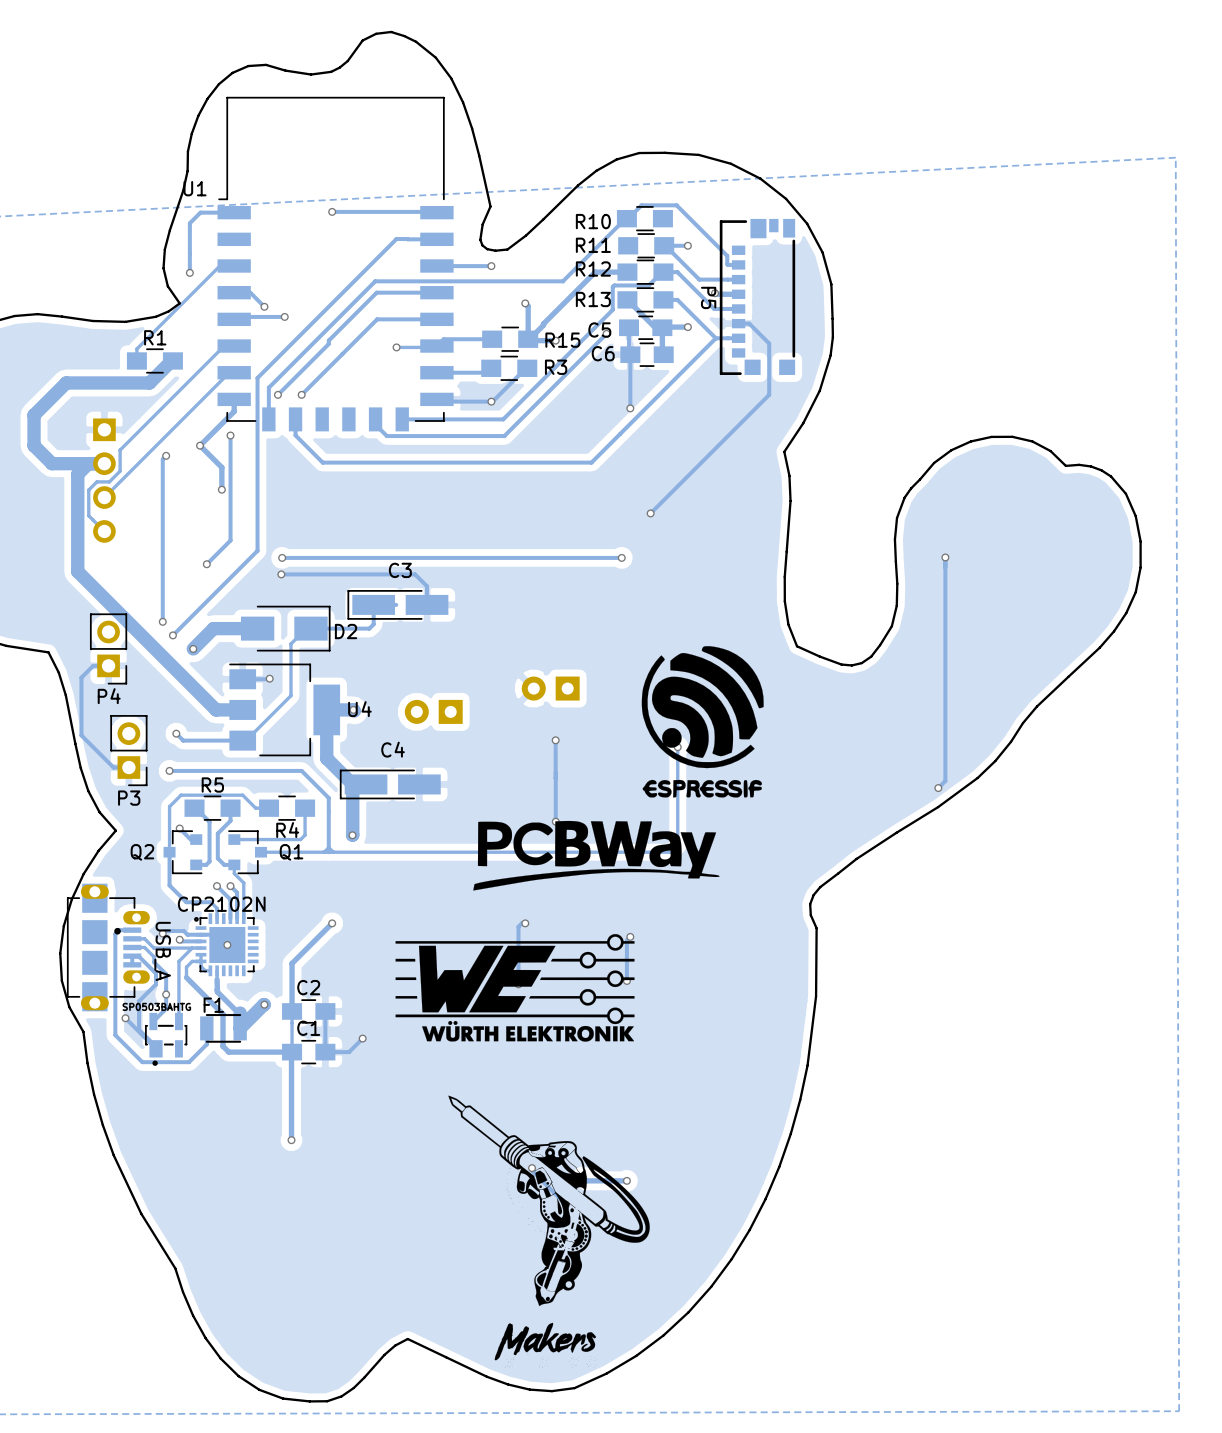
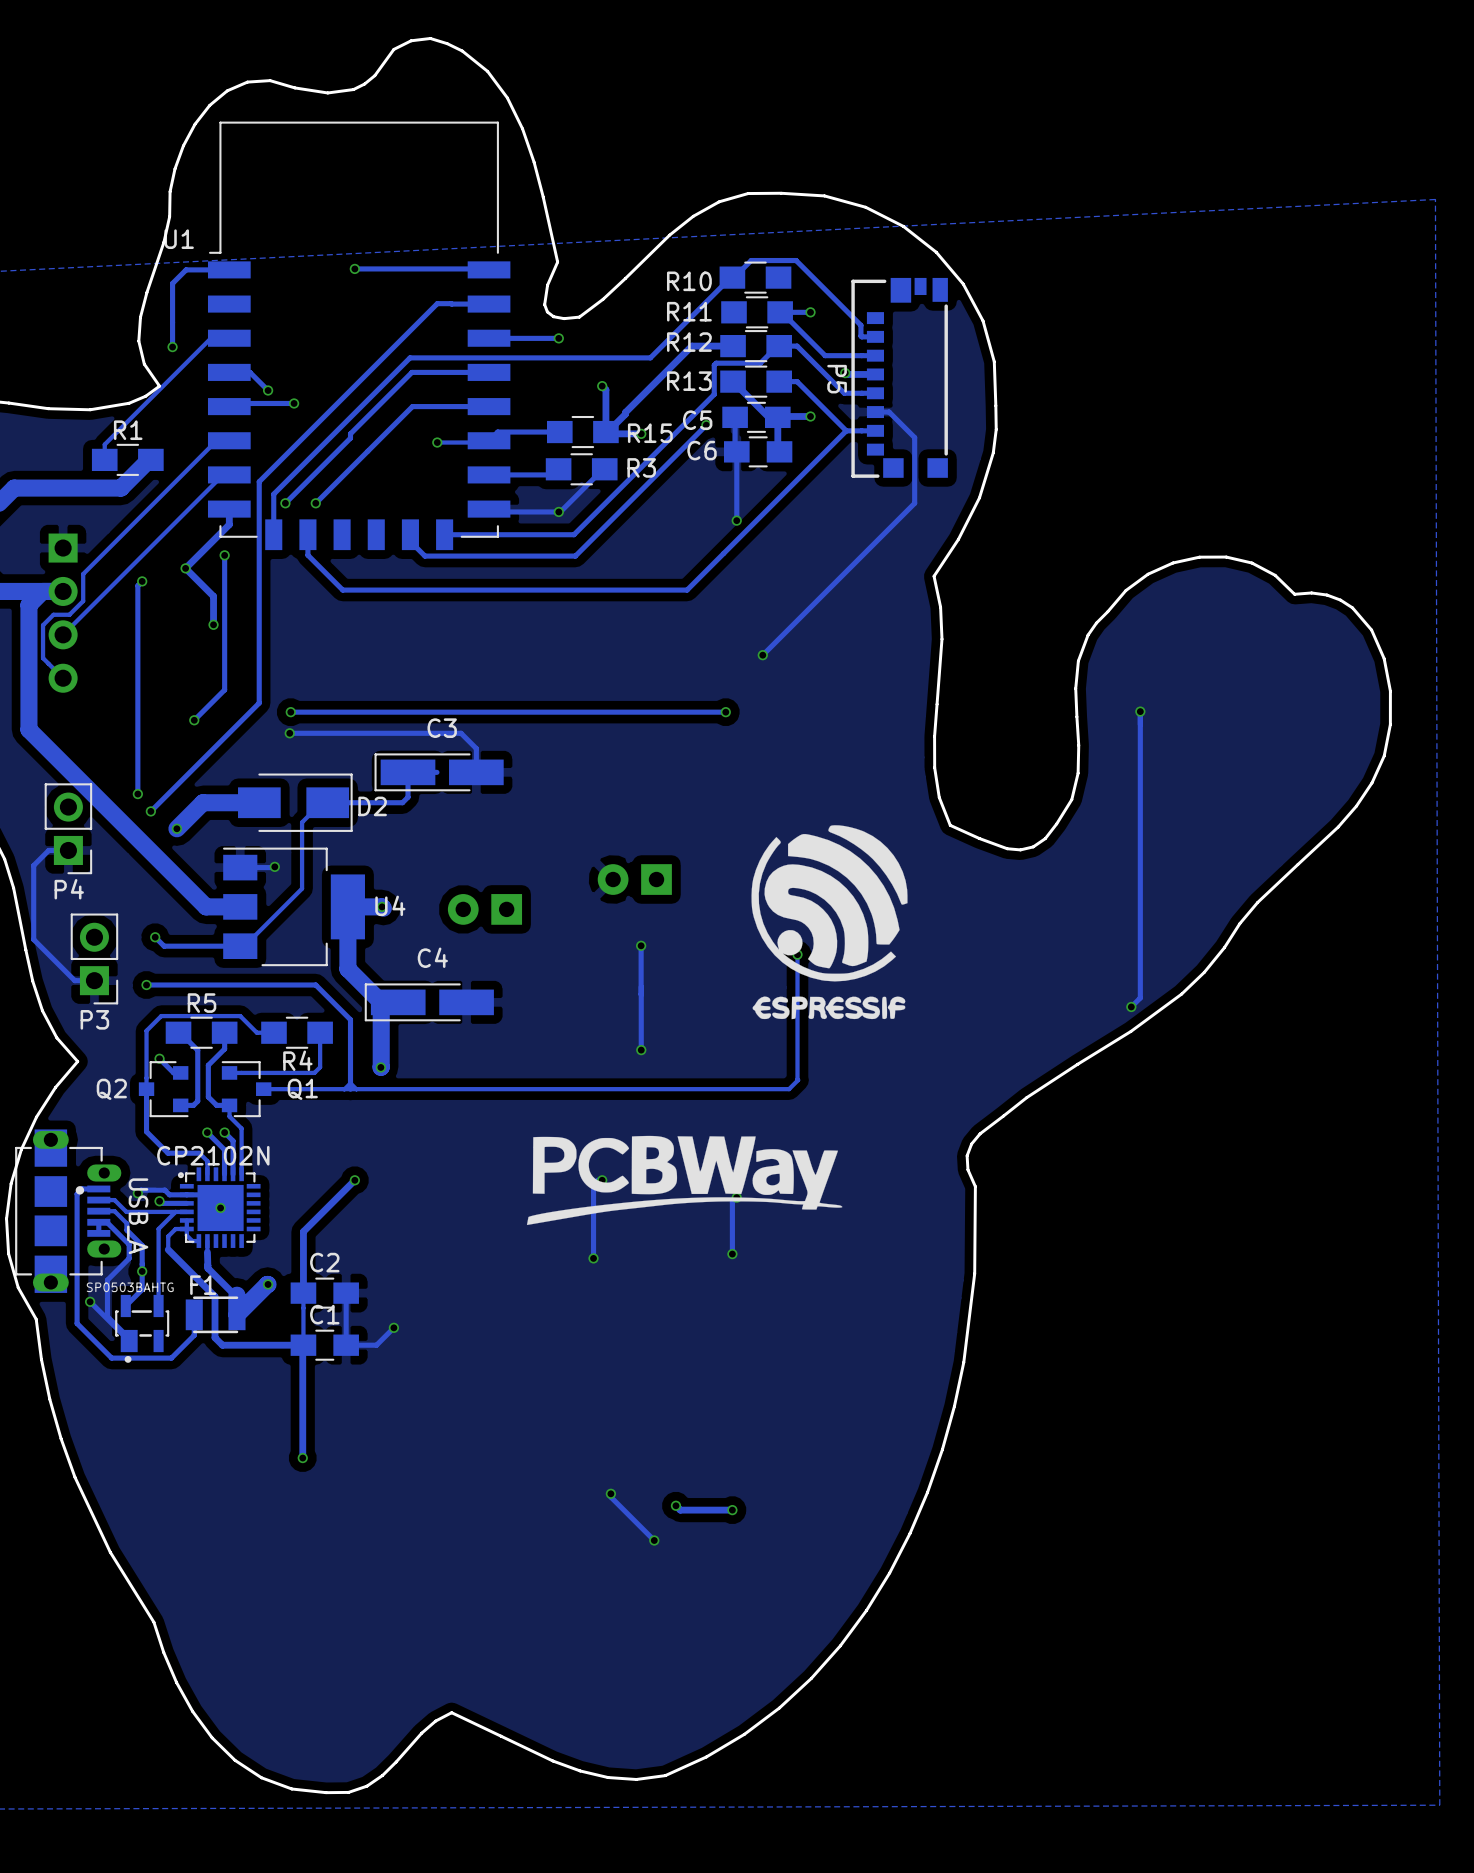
drawing position: (596, 855) -> (684, 1180)
drawing: [395, 934, 635, 1042] -> none
drawing: [448, 1095, 650, 1368] -> none

